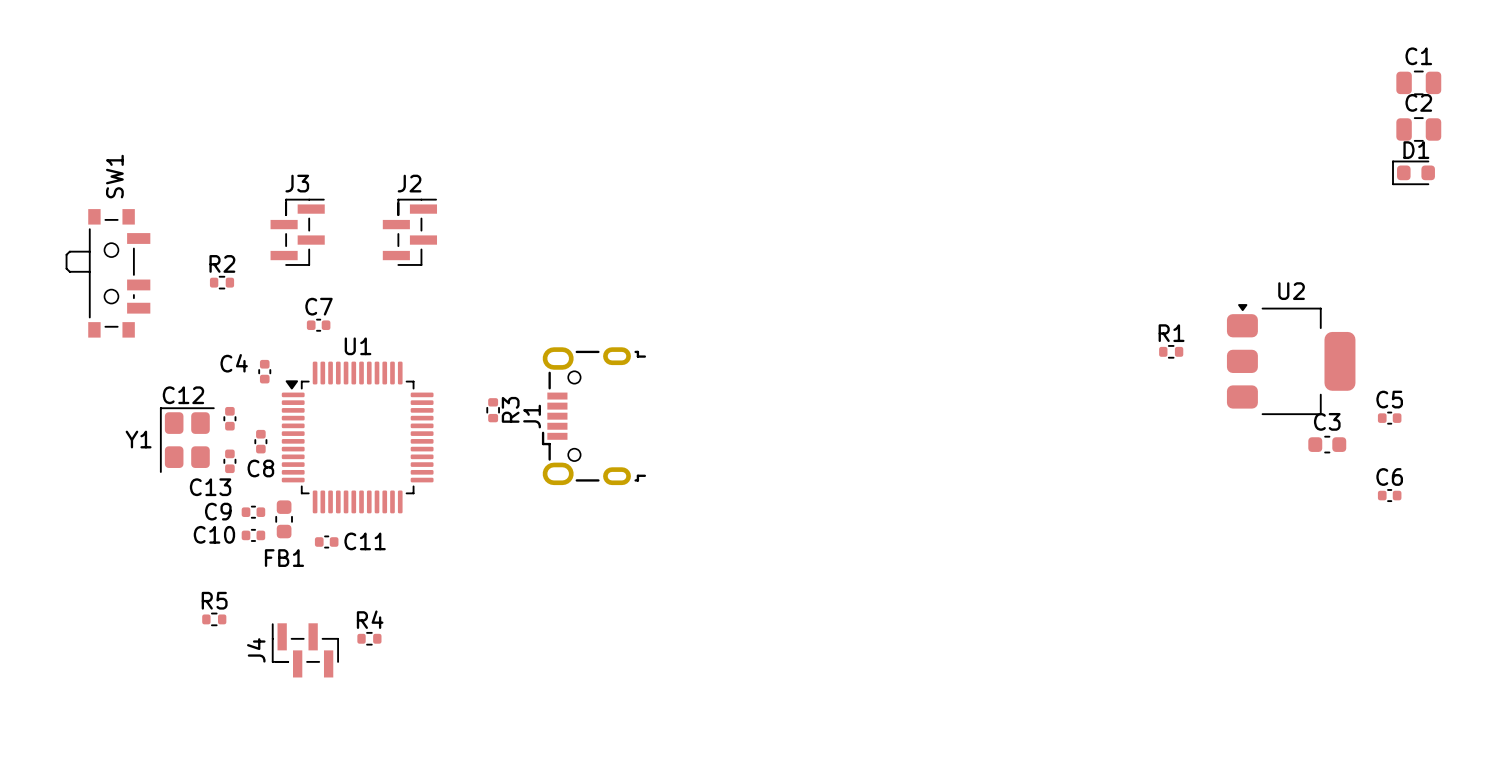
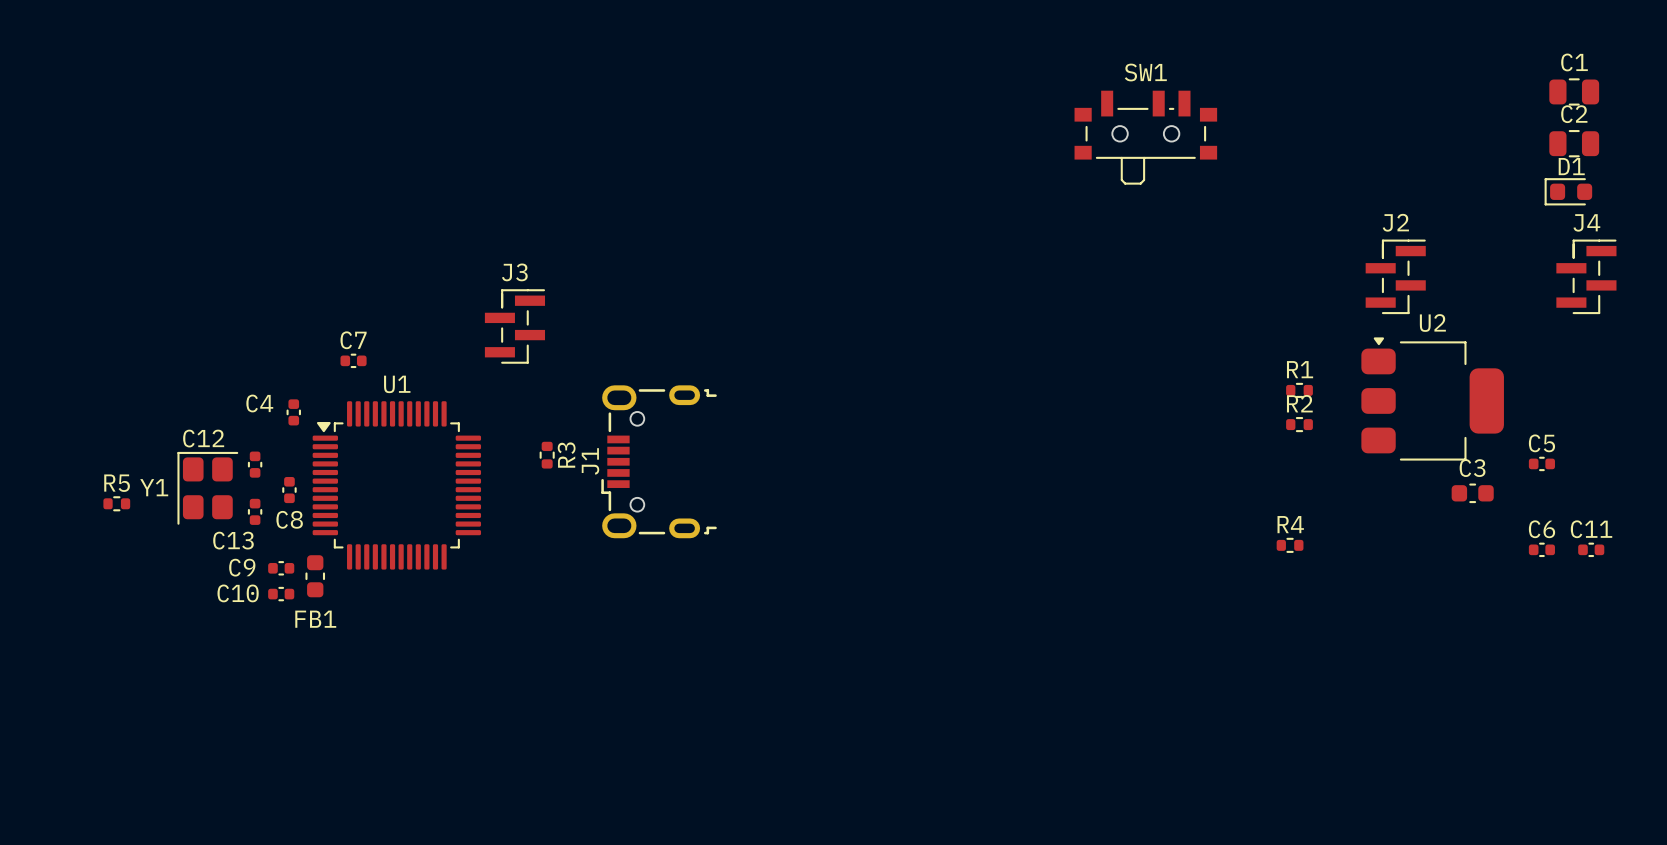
SW1 name position: SW1 (114, 176) -> SW1 (1145, 72)
J3 position: (297, 232) -> (514, 326)
J2 position: (409, 232) -> (1395, 276)
SW1 rotation: 0° (107, 273) -> 90° counterclockwise (1145, 137)
SW1 position: (107, 273) -> (1145, 137)
R2 position: (222, 282) -> (1299, 424)
C11 position: (326, 541) -> (1591, 549)
C11 name position: C11 (365, 541) -> C11 (1591, 529)
R5 position: (214, 619) -> (116, 503)
R4 position: (369, 638) -> (1290, 545)
J4 rotation: 0° (305, 650) -> 90° clockwise (1586, 276)
J4 position: (305, 650) -> (1586, 276)

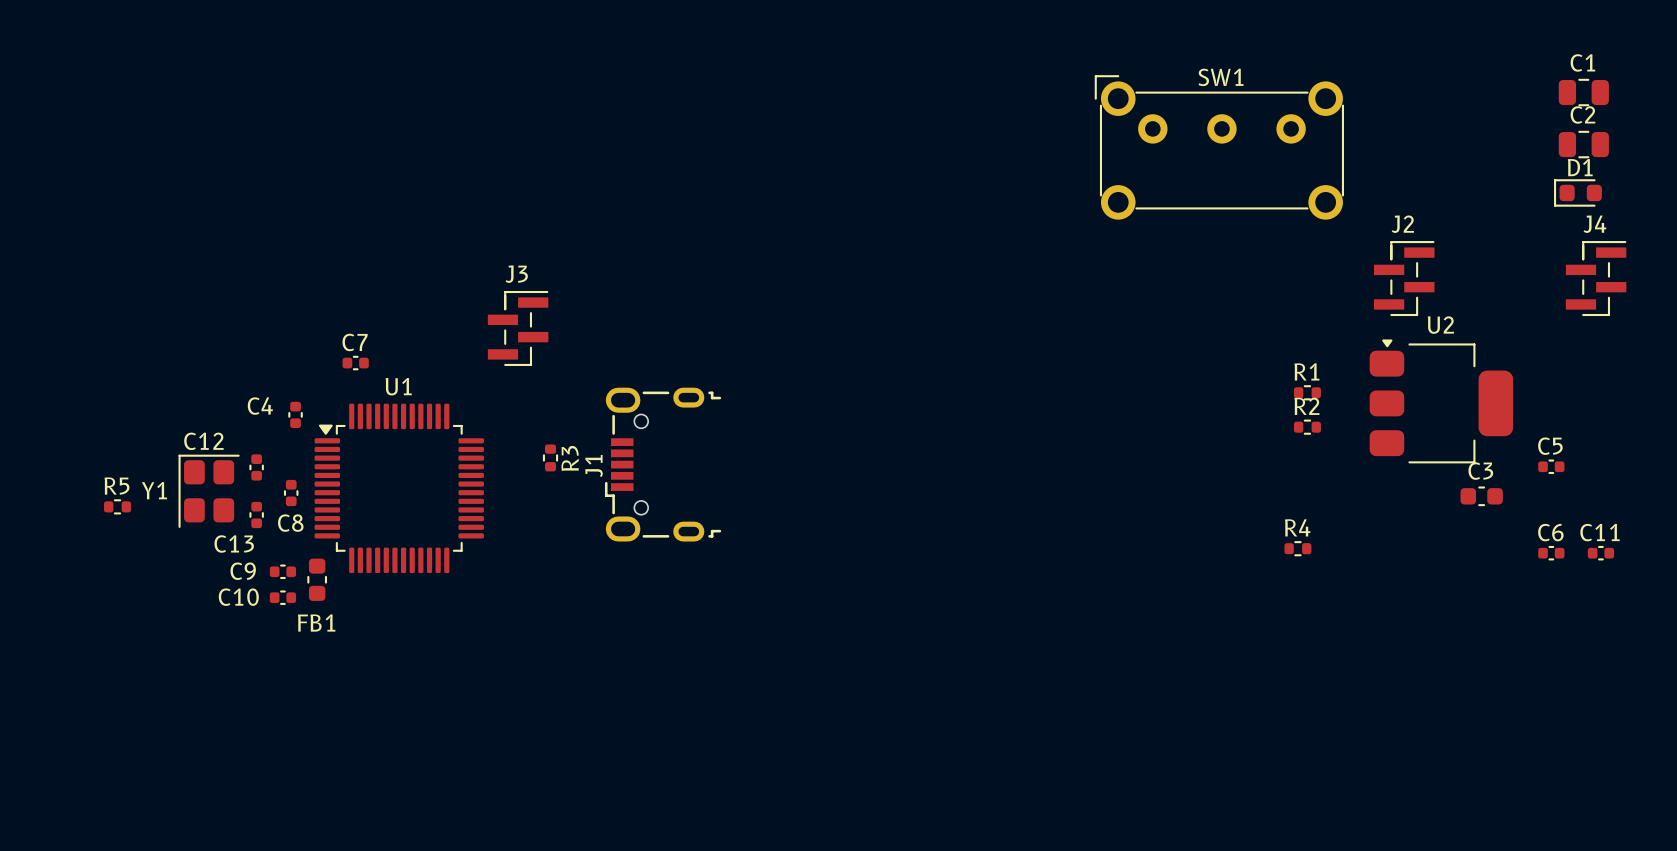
SW1 footprint: [1074, 90, 1218, 185] -> [1094, 75, 1344, 220]

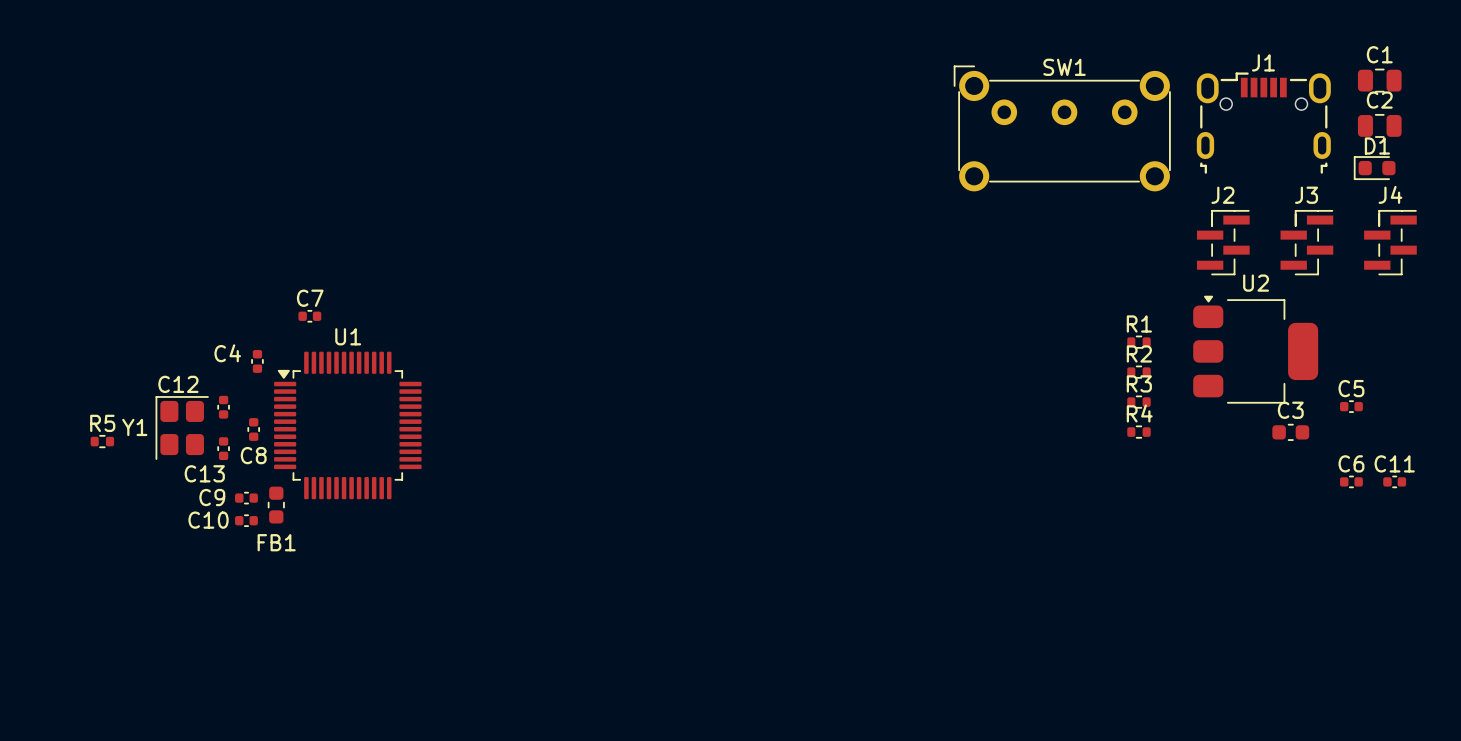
J3 position: (518, 328) -> (1306, 242)
R3 rotation: 0° (550, 457) -> 90° clockwise (1138, 402)
R3 position: (550, 457) -> (1138, 402)
J1 rotation: 0° (663, 464) -> 90° clockwise (1263, 123)
J1 position: (663, 464) -> (1263, 123)
R4 position: (1297, 548) -> (1138, 432)

